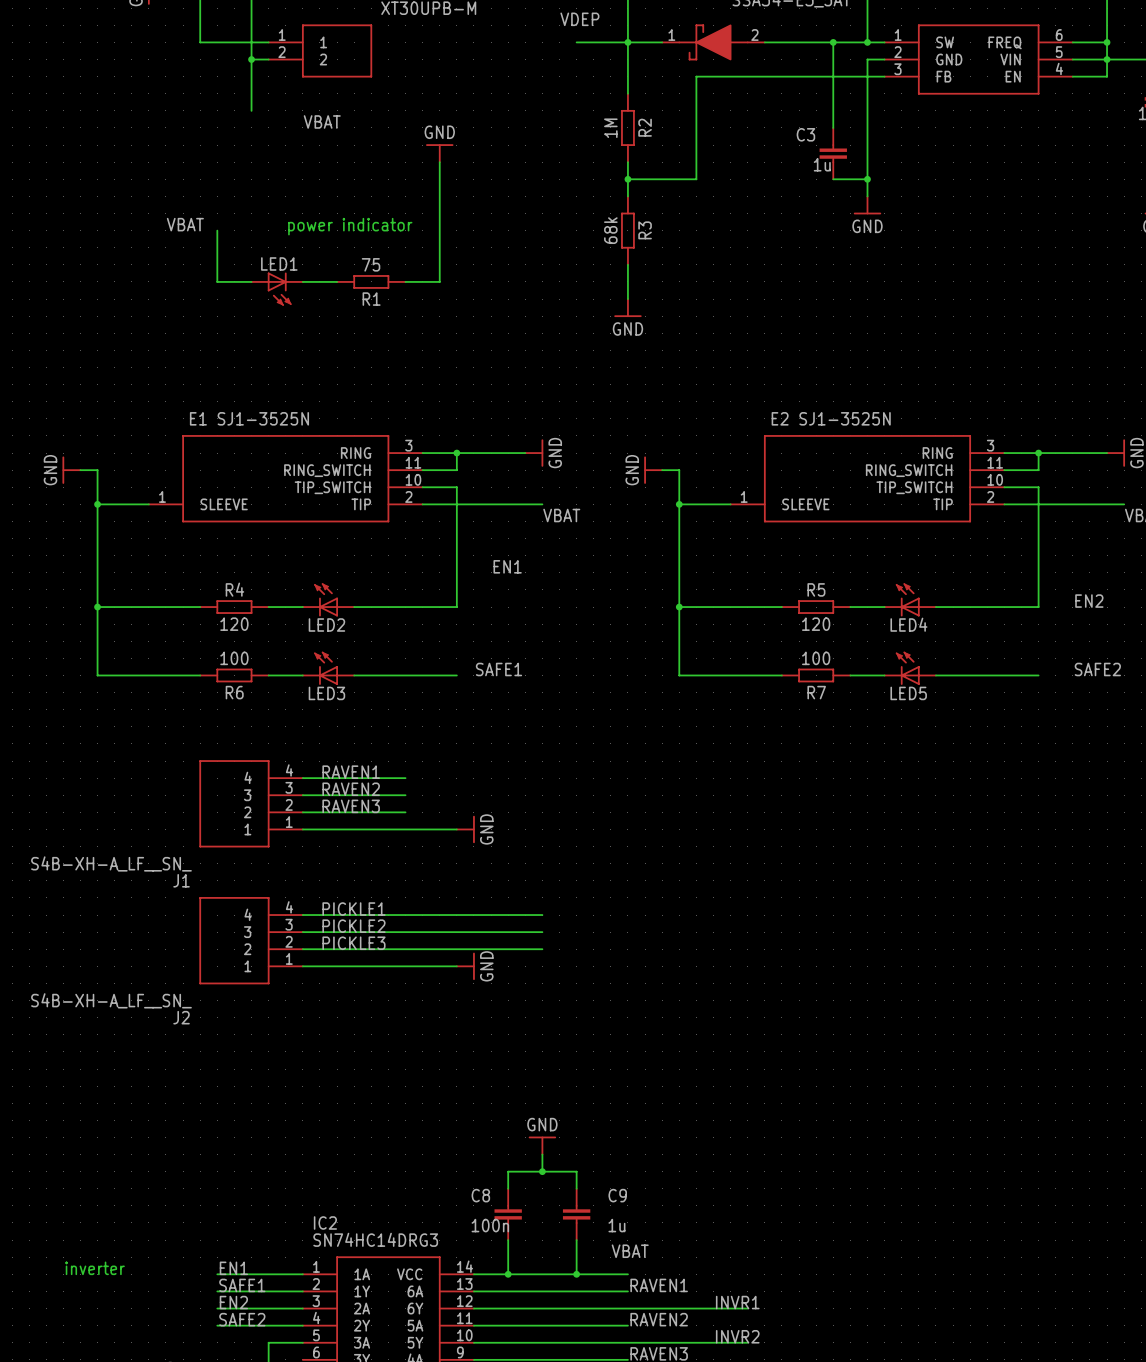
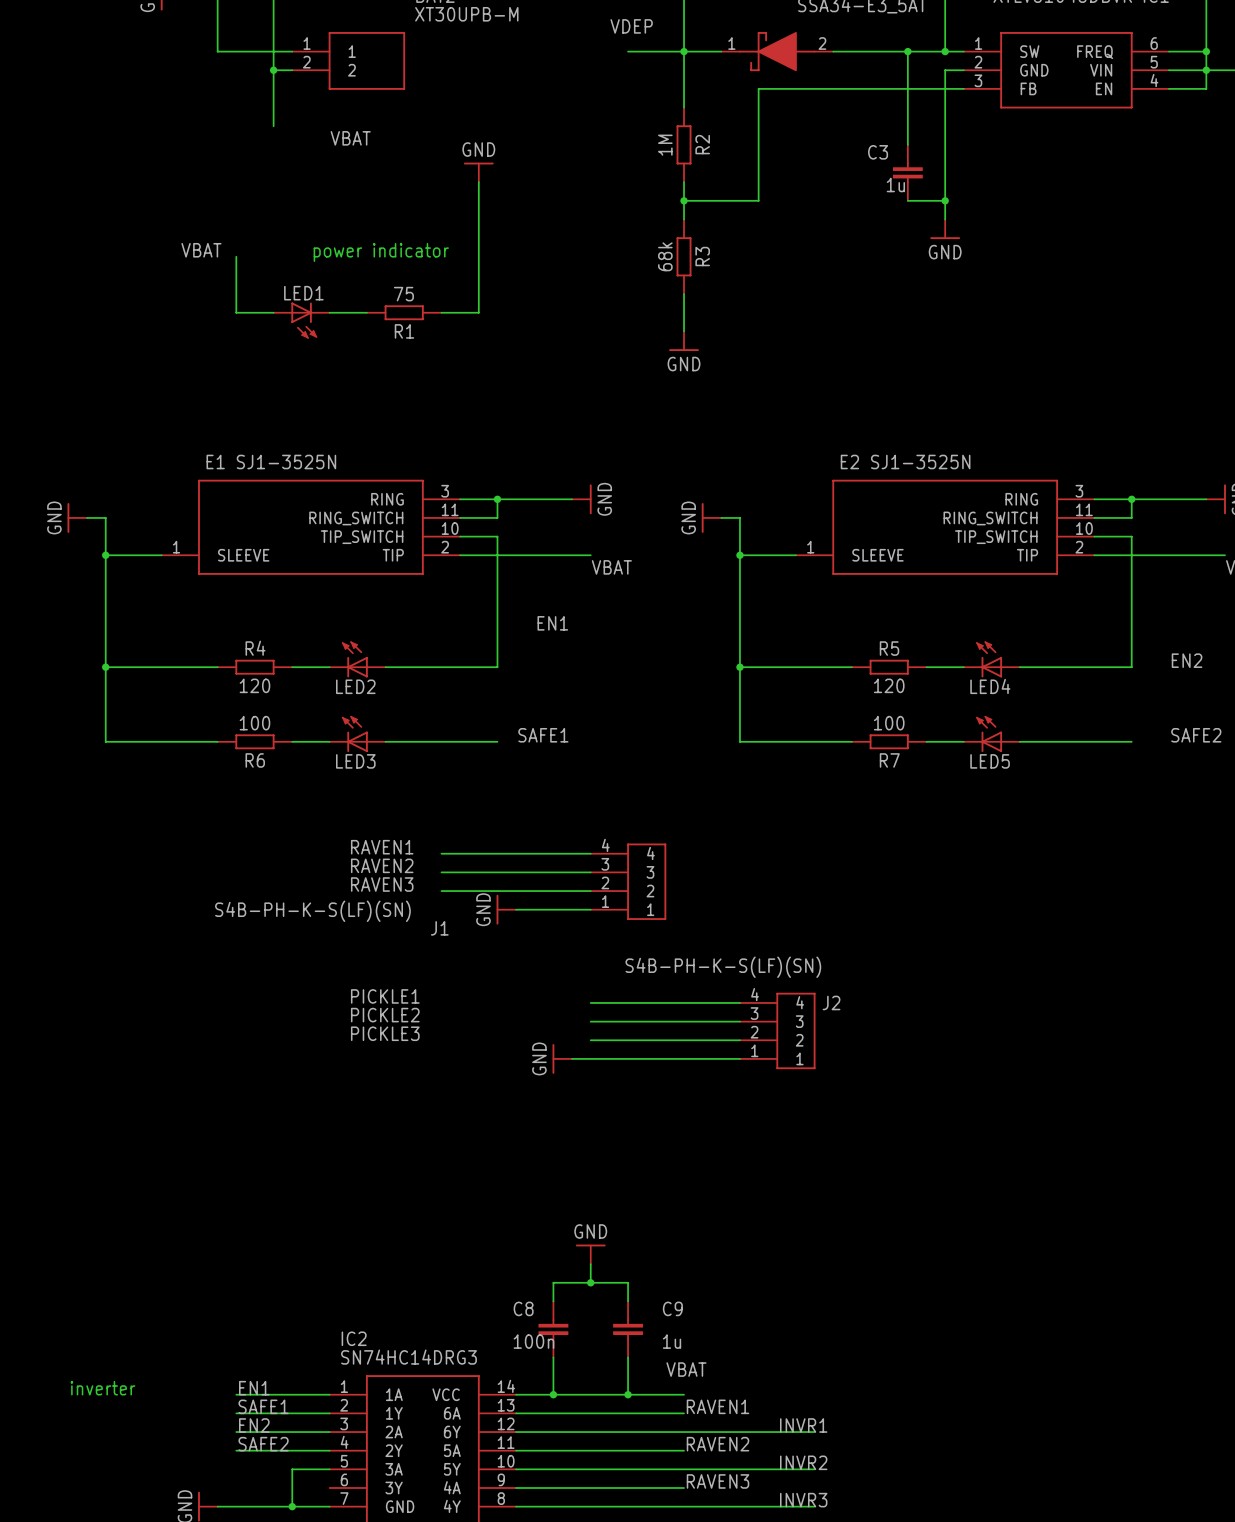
J1 symbol: [199, 760, 303, 848] -> [590, 843, 667, 920]
wire: (302, 778) (405, 778) -> (590, 853) (441, 853)
wire: (302, 795) (405, 795) -> (590, 872) (441, 872)
wire: (302, 812) (405, 812) -> (590, 891) (441, 891)
wire: (302, 829) (456, 829) -> none
wire: none -> (516, 909) (590, 909)
power symbol rotation: 0° (473, 829) -> 180° (497, 909)
J1 value: S4B-XH-A_LF__SN_ (111, 863) -> S4B-PH-K-S(LF)(SN) (312, 911)
J1 name position: J1 (181, 880) -> J1 (439, 928)
J2 symbol: [199, 897, 303, 985] -> [739, 992, 816, 1070]
wire: (302, 915) (542, 915) -> (739, 1002) (590, 1002)
wire: (302, 932) (542, 932) -> (739, 1021) (590, 1021)
wire: (302, 949) (542, 949) -> (739, 1040) (590, 1040)
wire: (302, 966) (456, 966) -> none
power symbol position: GND (465, 966) -> GND (562, 1058)
power symbol rotation: 0° (473, 966) -> 180° (553, 1058)
wire: none -> (572, 1058) (739, 1058)
J2 value: S4B-XH-A_LF__SN_ (111, 1000) -> S4B-PH-K-S(LF)(SN) (723, 967)
J2 name position: J2 (181, 1017) -> J2 (831, 1002)

